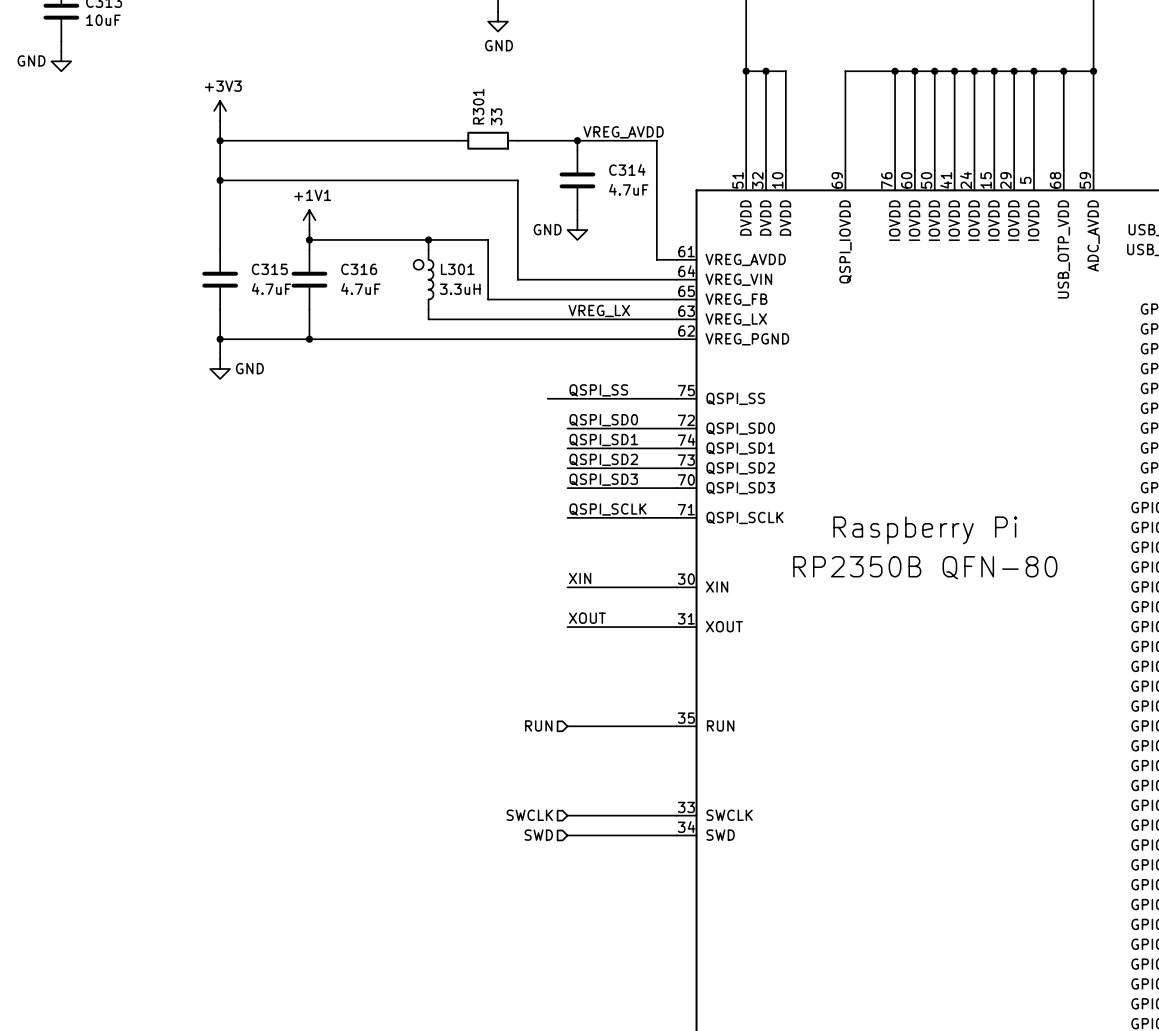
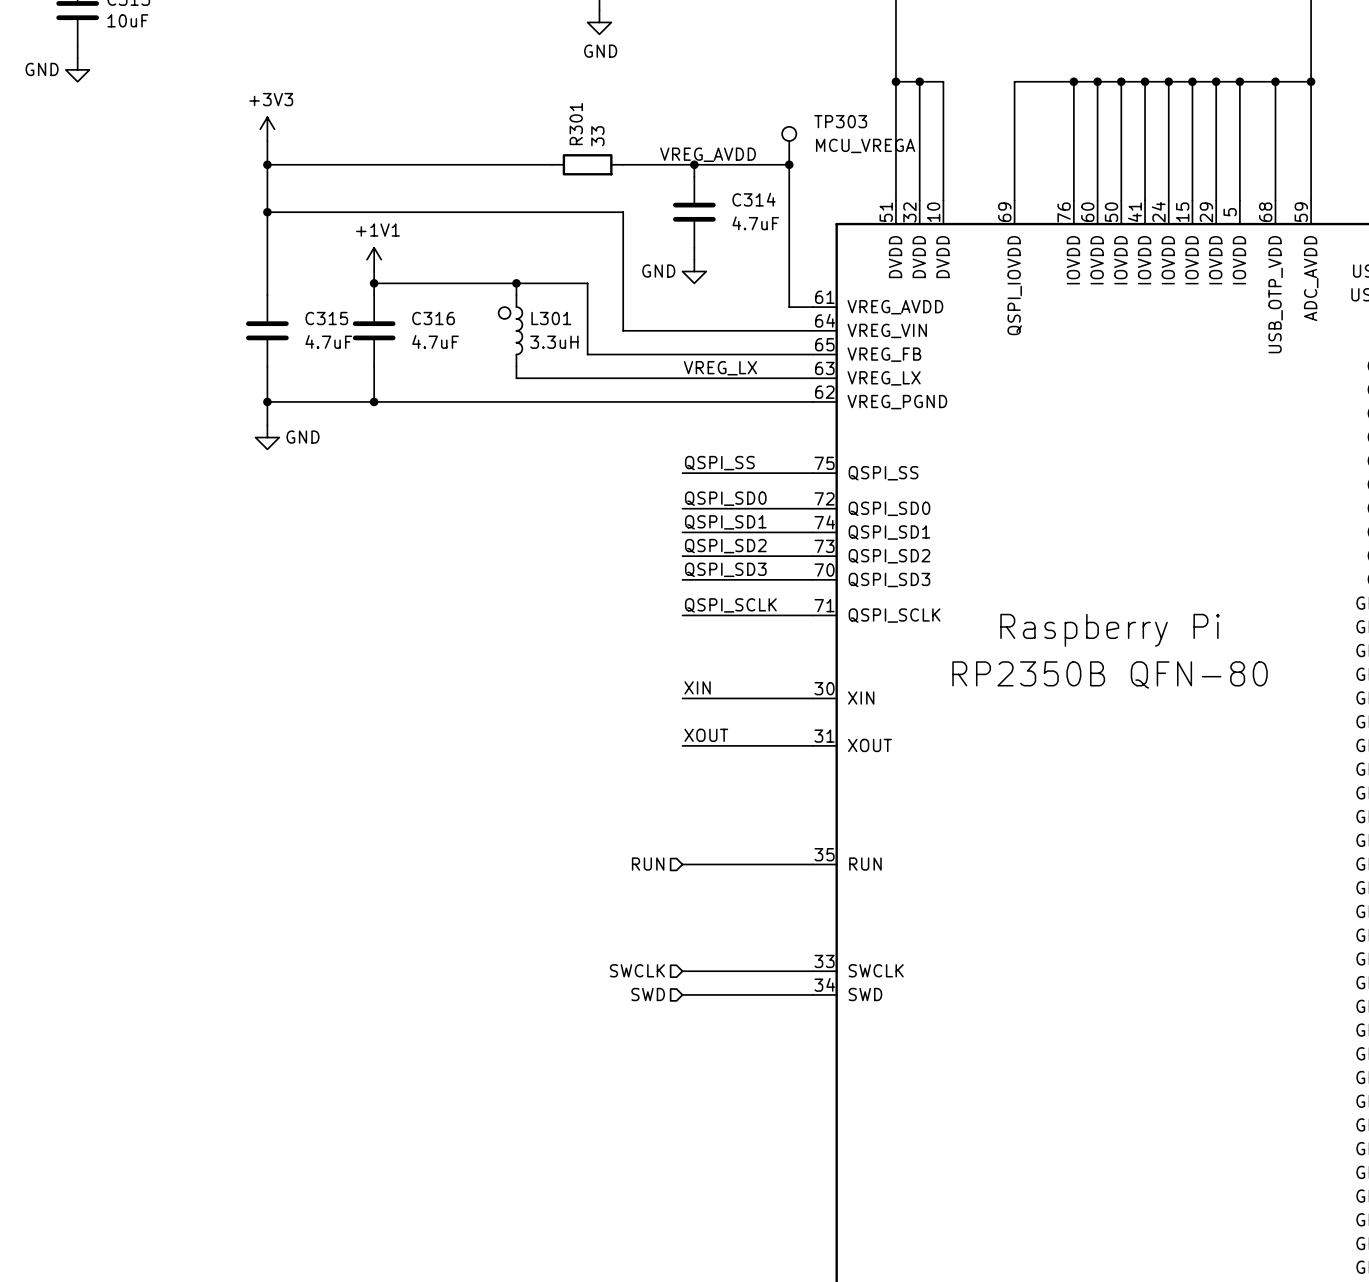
TP303: none -> MCU_VREGA (789, 145)
label position: VREG_AVDD (623, 132) -> VREG_AVDD (708, 154)
junction: none -> (789, 164)
wire: (547, 398) (567, 398) -> none

